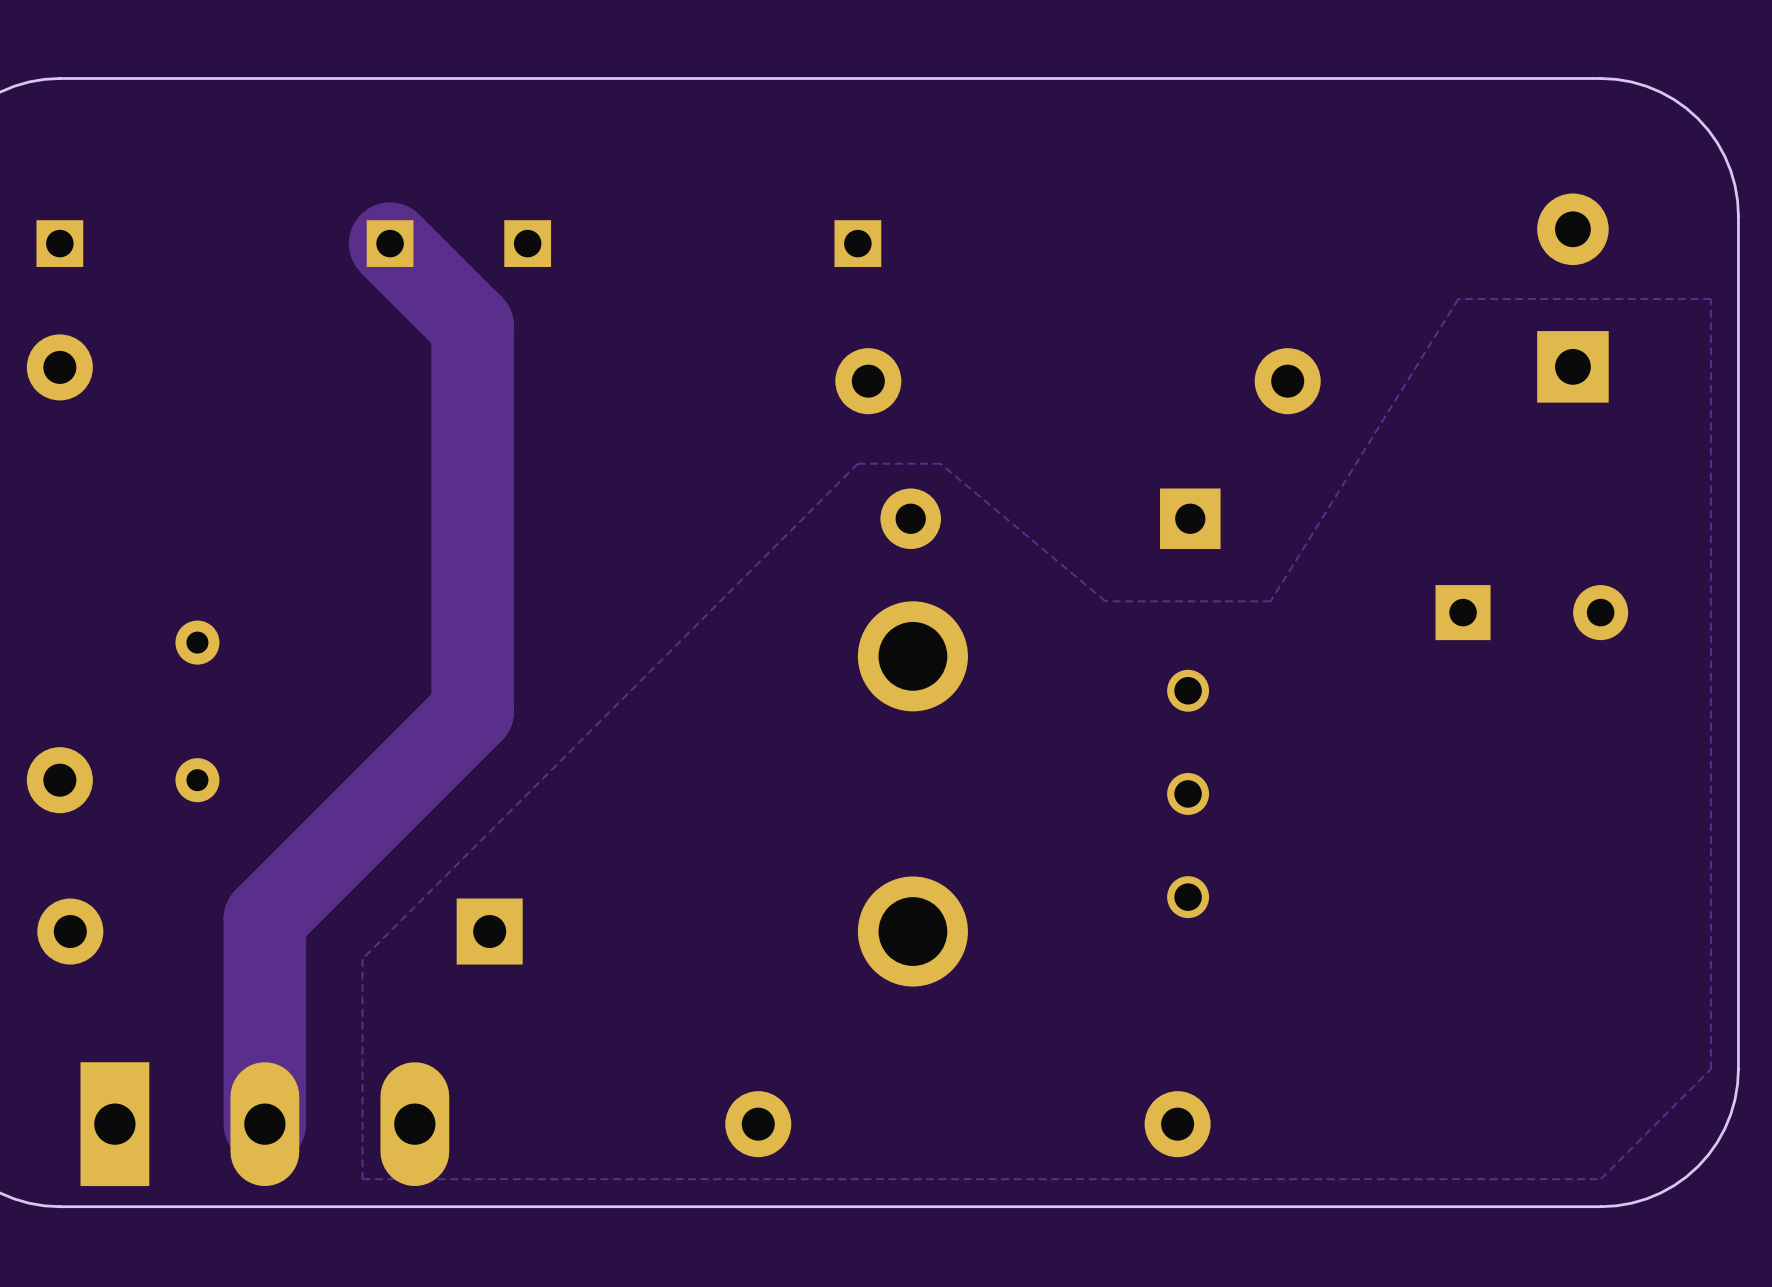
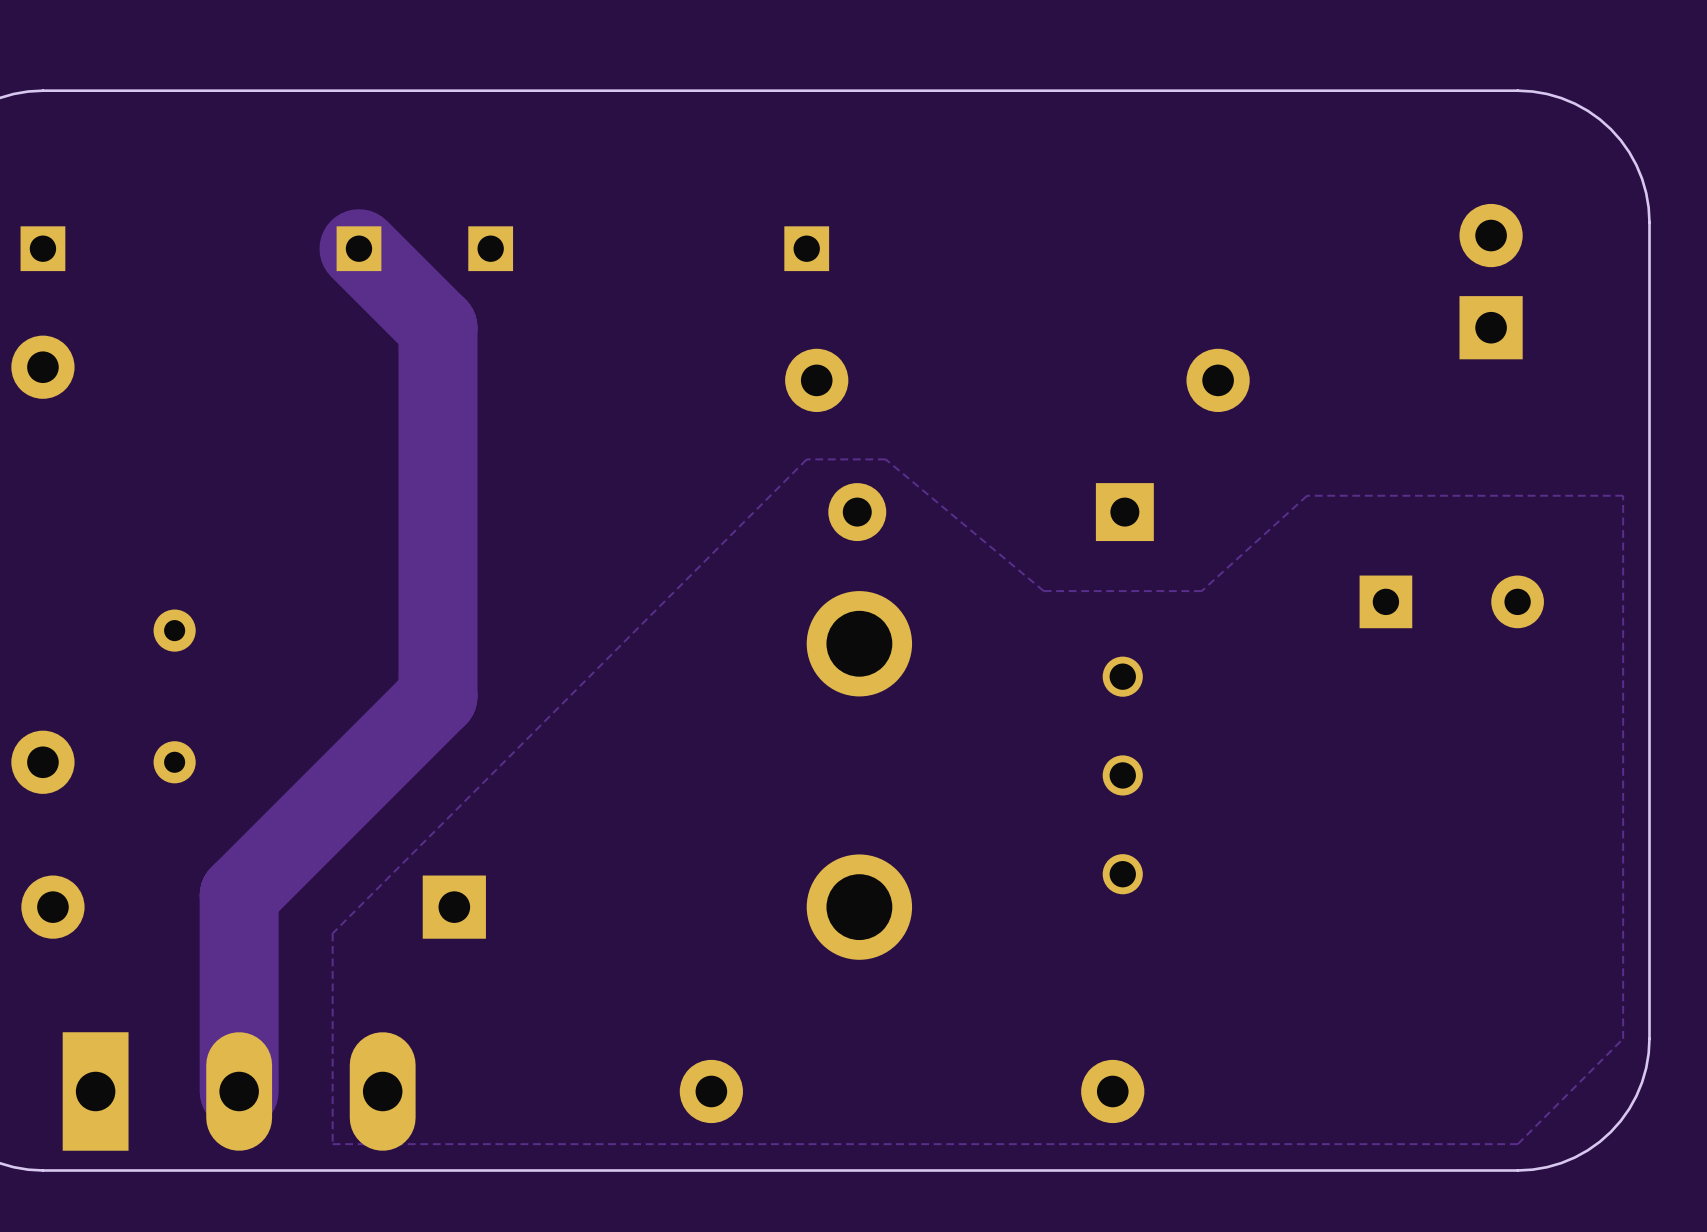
part footprint: [1537, 193, 1609, 403] -> [1459, 203, 1523, 360]
zone outline: (1710, 501) (1710, 299) (1458, 299) (1270, 601) -> (1623, 495) (1307, 495) (1201, 591)

